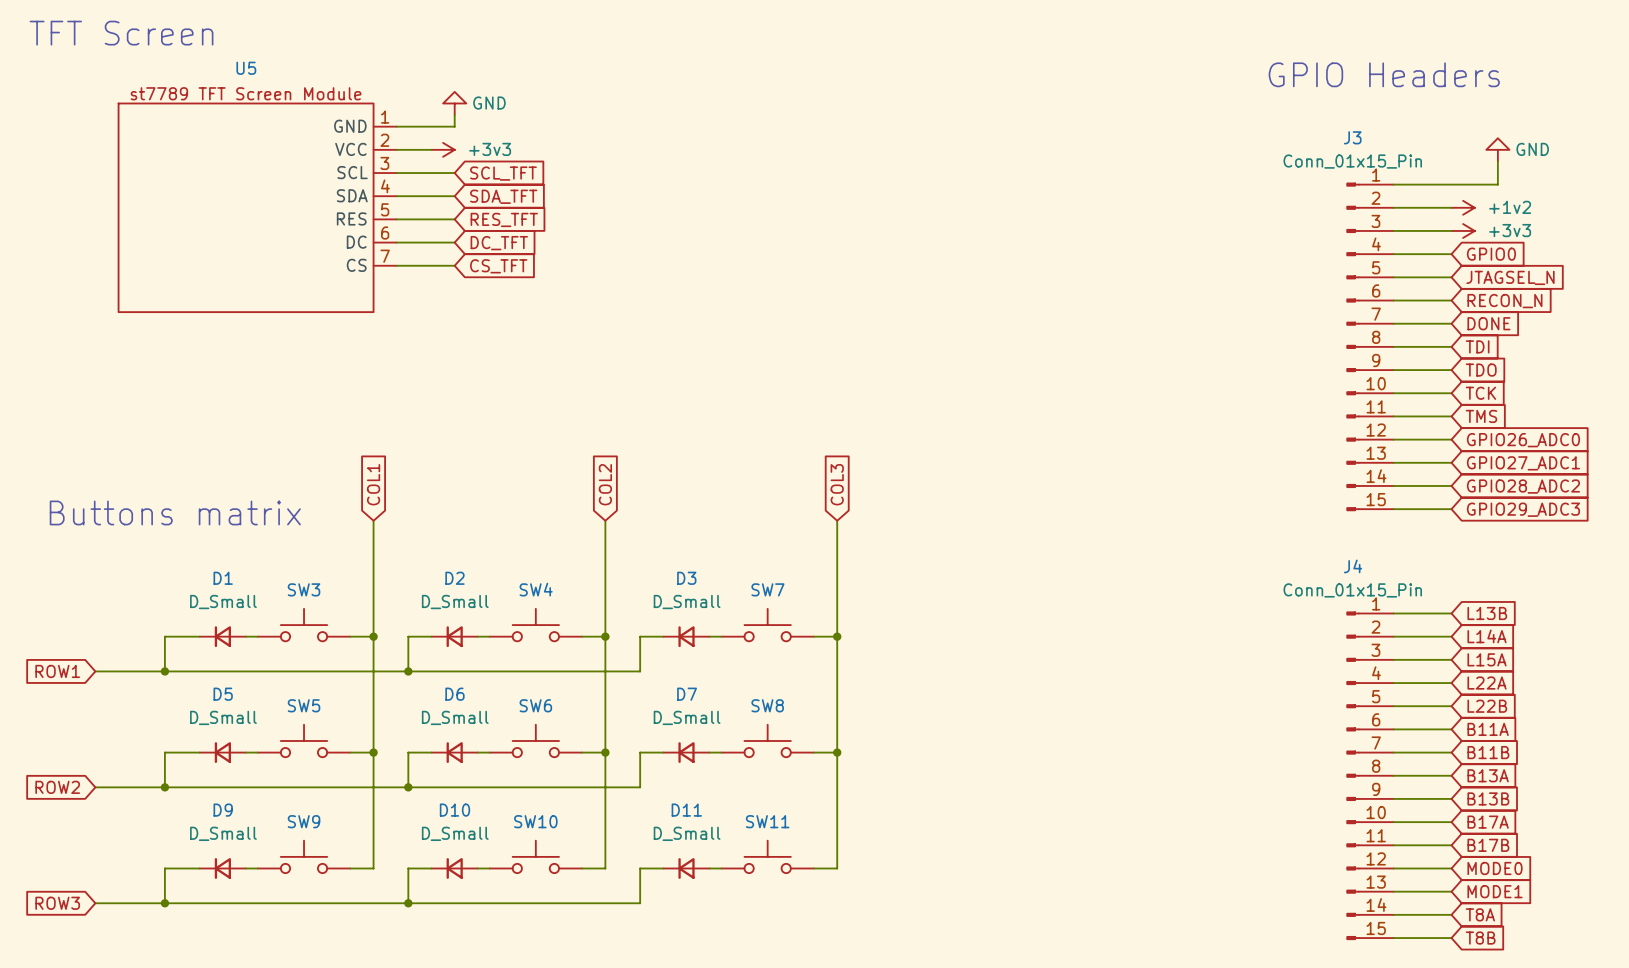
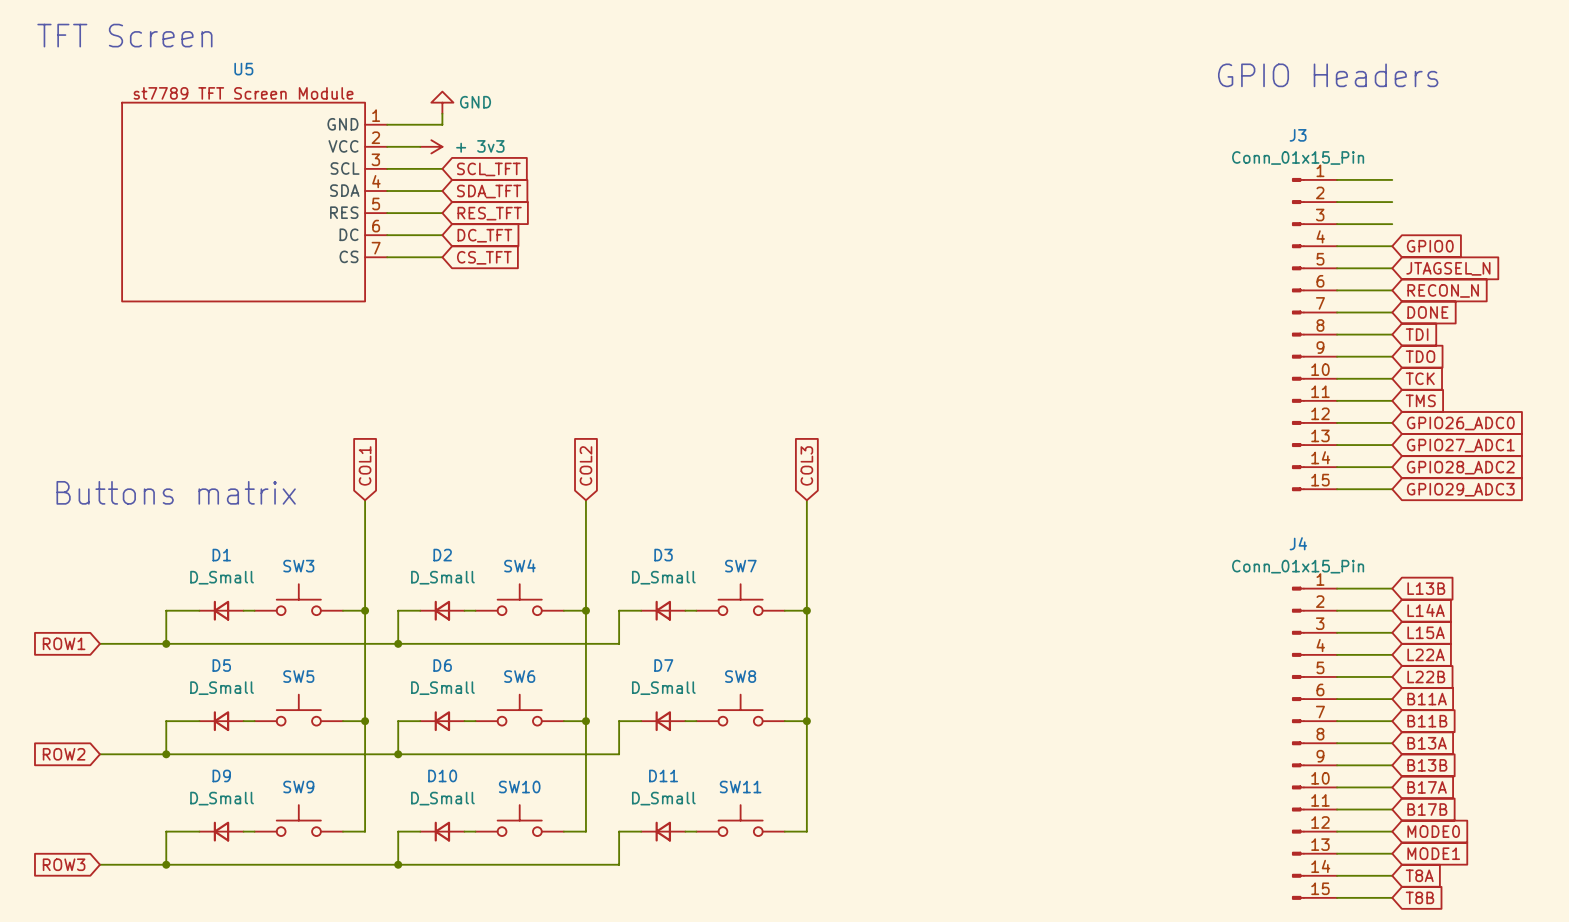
power symbol: +3v3 (443, 149) -> + 3v3 (431, 146)
power symbol: GND (1497, 149) -> none
wire: (1497, 161) (1497, 184) (1451, 184) -> none
power symbol: +1v2 (1463, 207) -> none
power symbol: +3v3 (1463, 230) -> none

